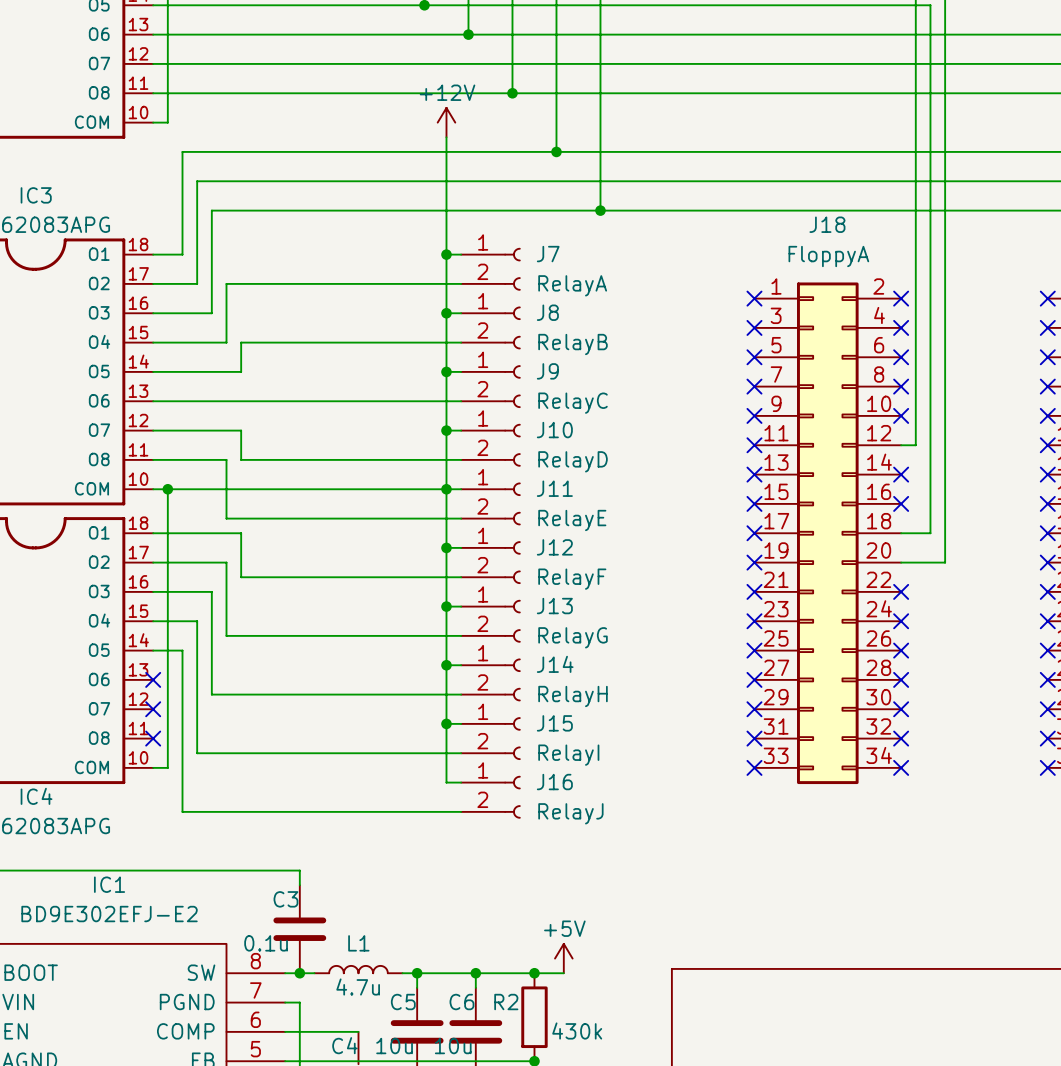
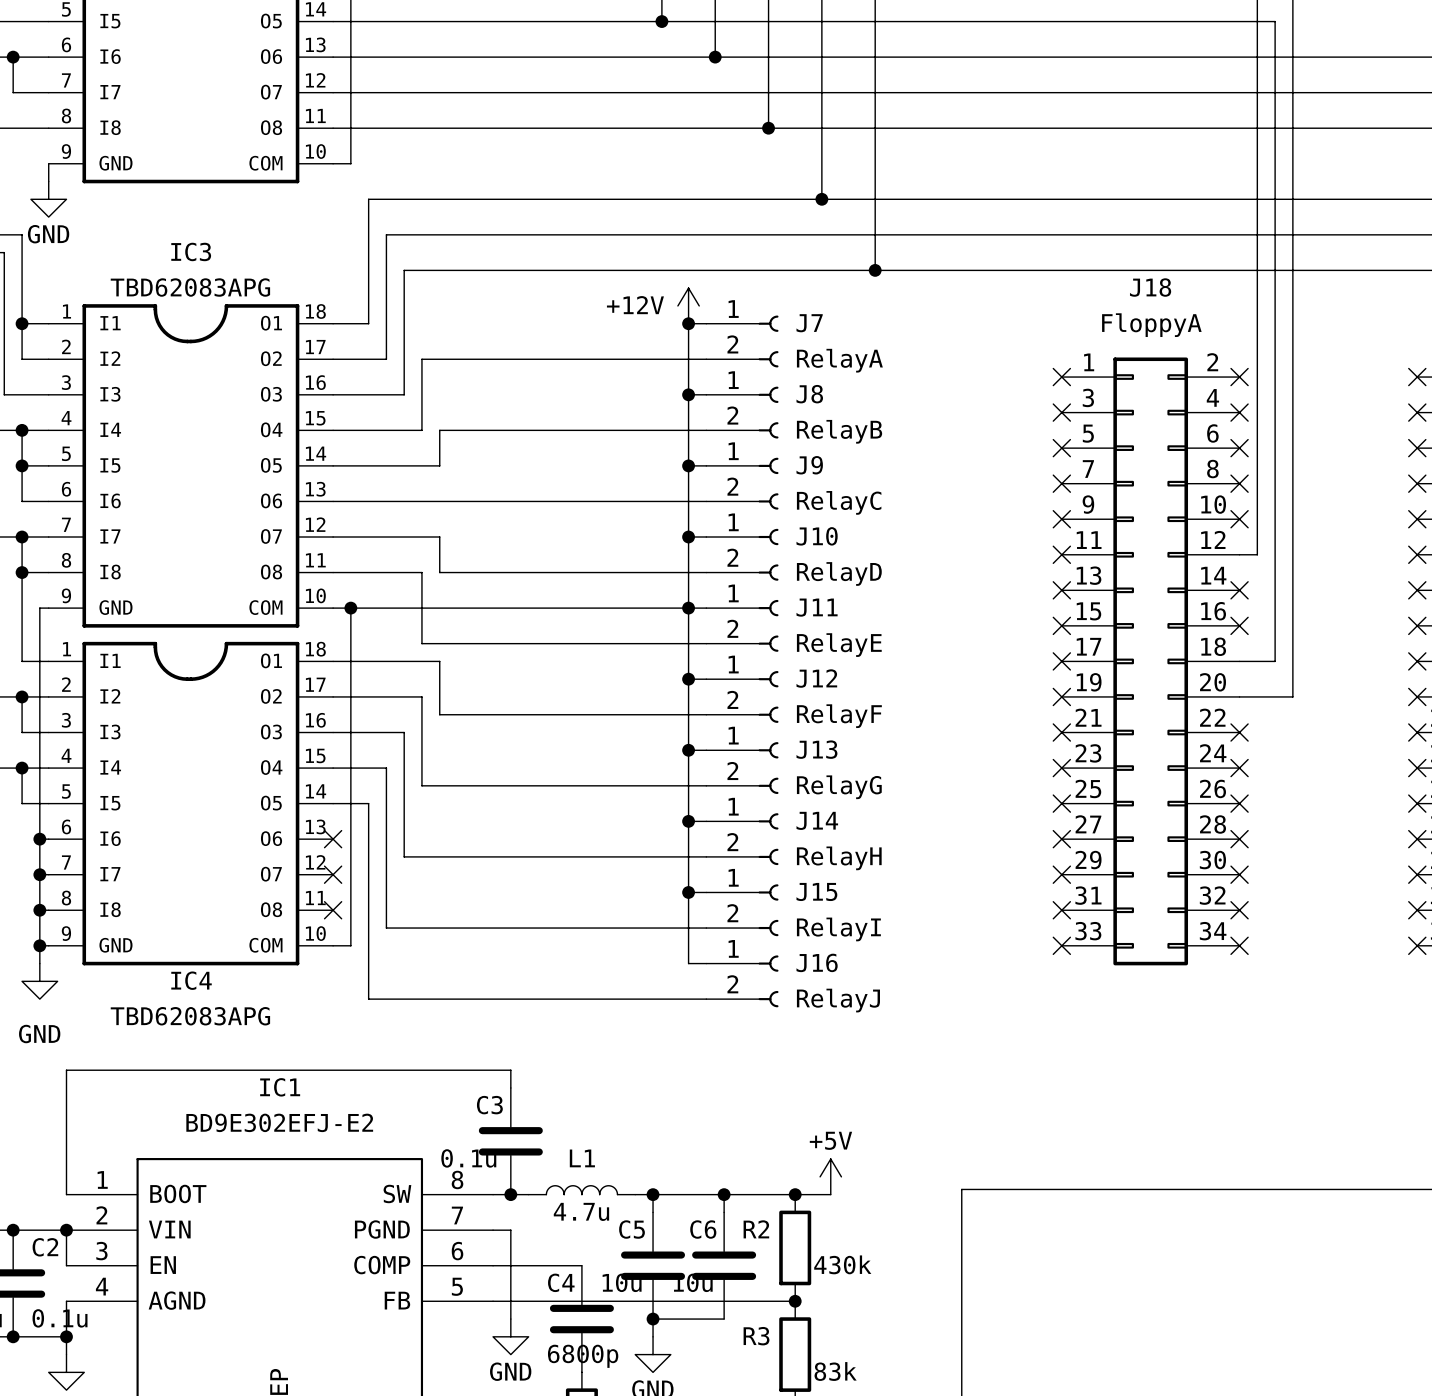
power symbol text position: +12V (447, 92) -> +12V (635, 305)
power symbol position: +12V (446, 122) -> +12V (688, 305)
wire: (446, 137) (446, 254) -> none

